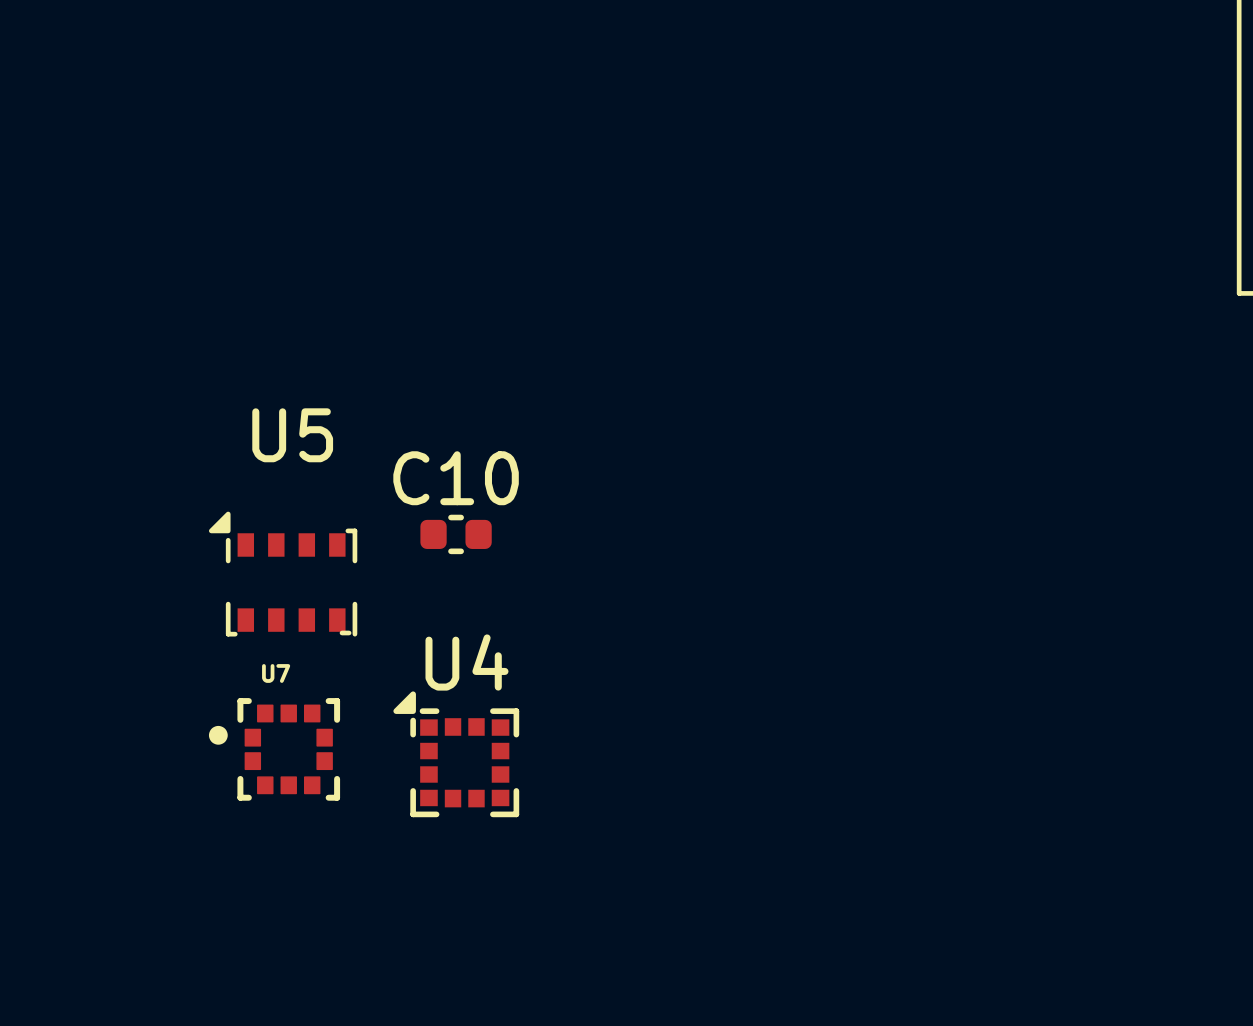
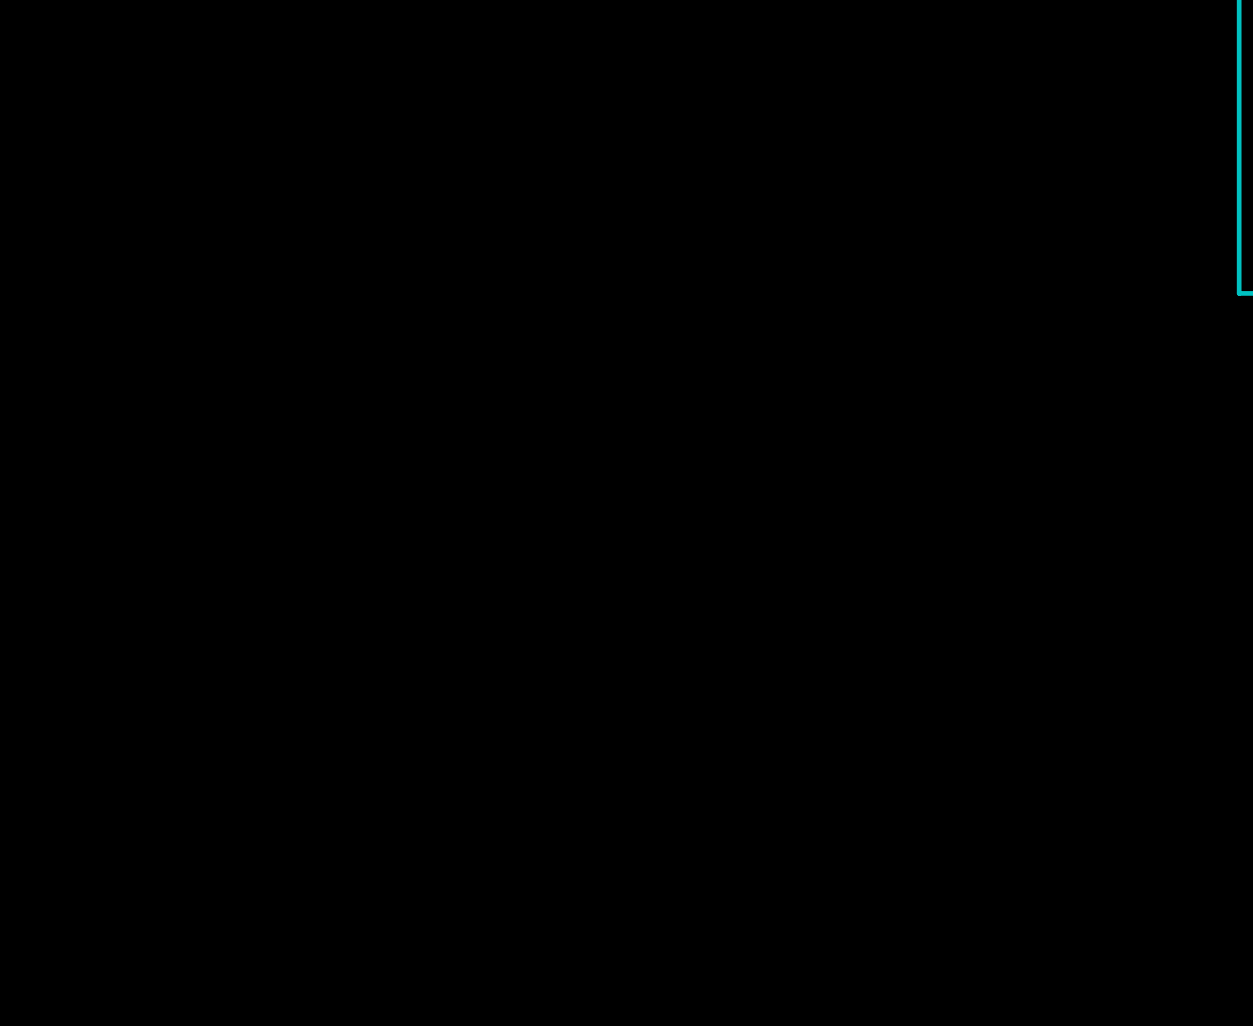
C10: (456, 534) -> none
U5: (283, 574) -> none
U7: (274, 749) -> none
U4: (456, 754) -> none

